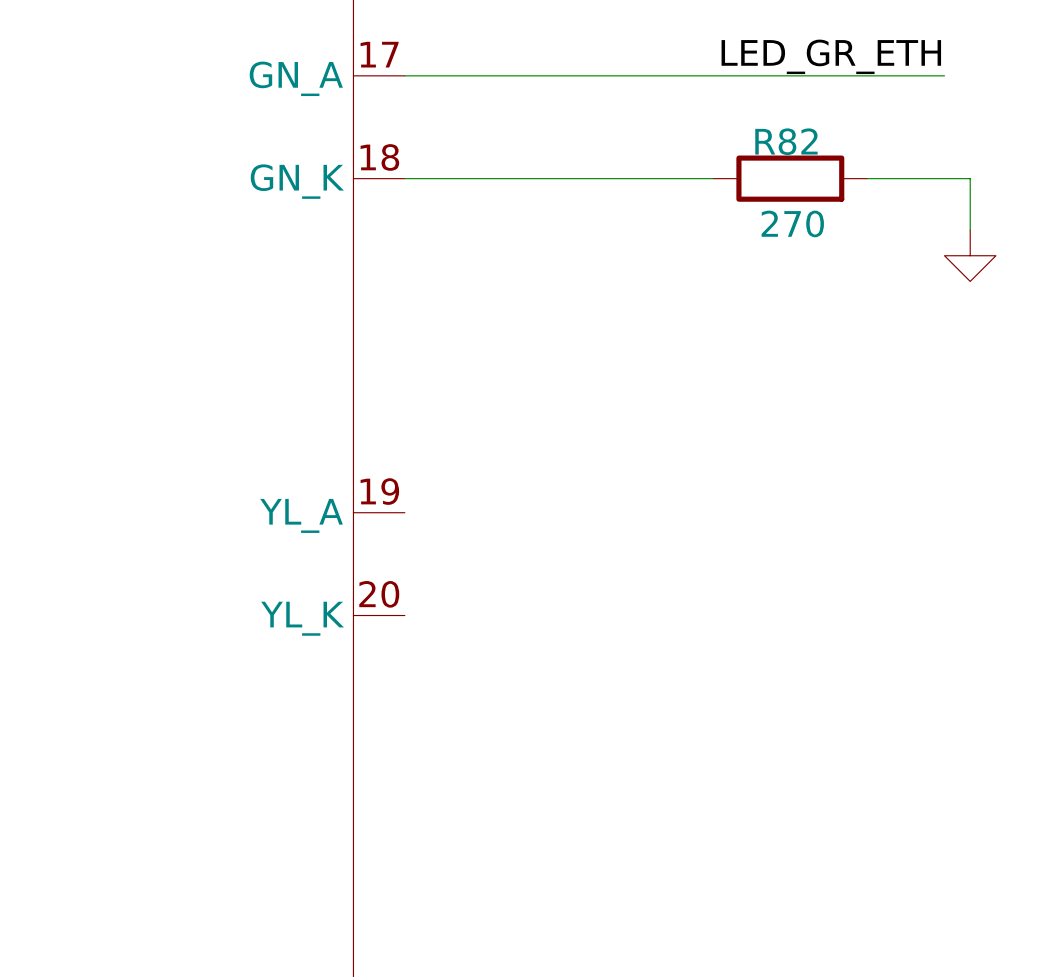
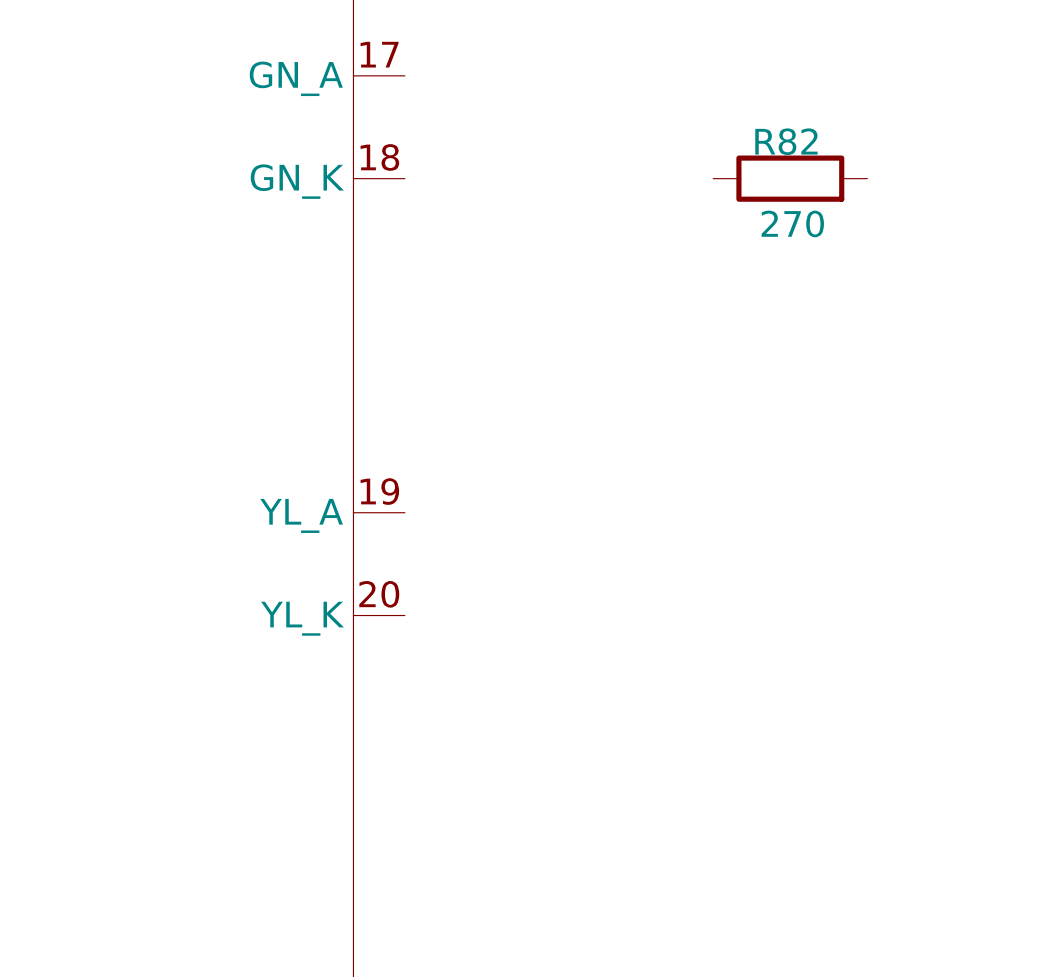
label: LED_GR_ETH (831, 56) -> none
wire: (404, 75) (944, 75) -> none
wire: (404, 178) (713, 178) -> none
wire: (867, 178) (970, 178) (970, 230) -> none
power symbol: (970, 255) -> none

